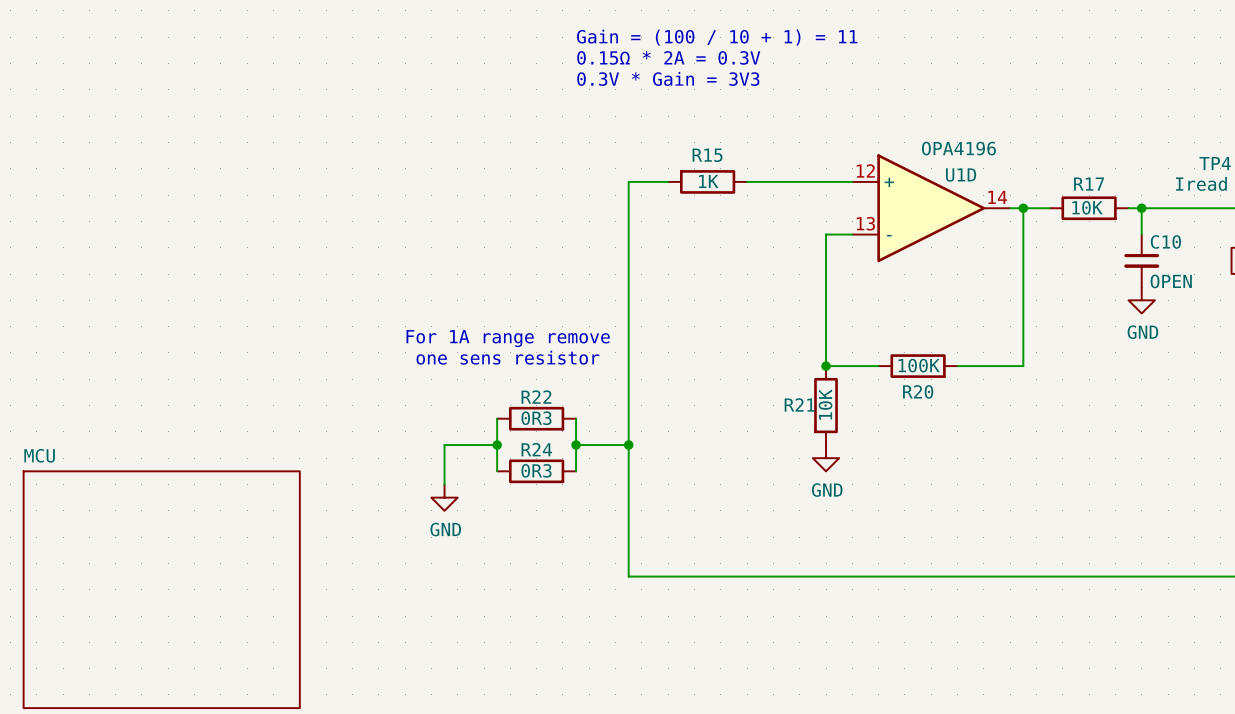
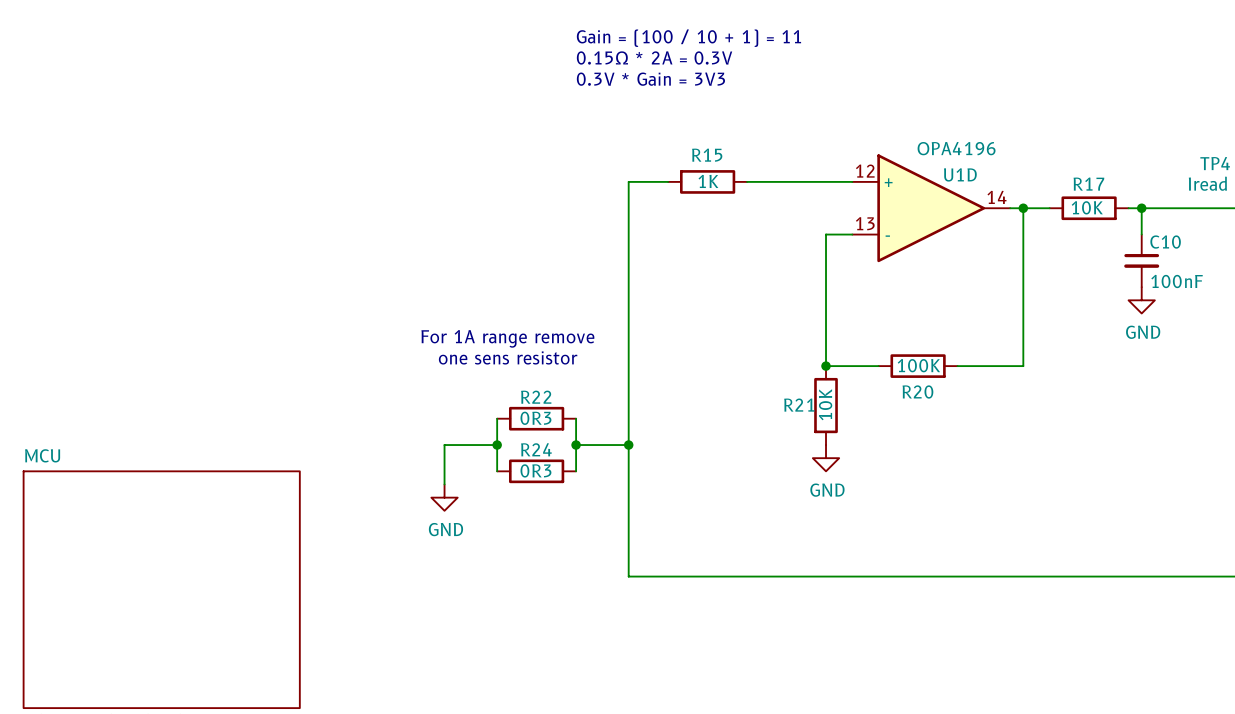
C10 value: OPEN (1171, 281) -> 100nF (1177, 281)

